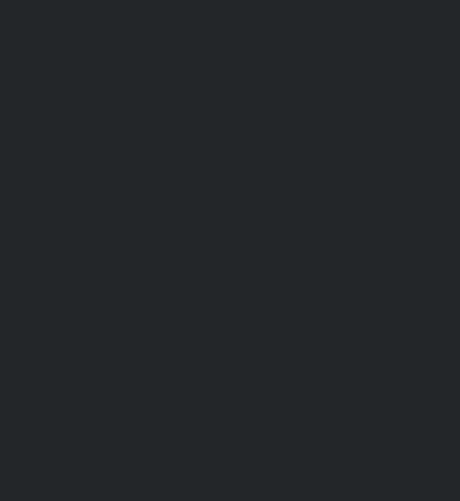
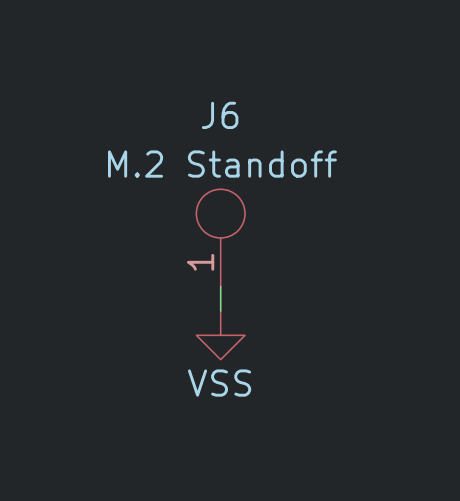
J6: none -> M.2 Standoff (220, 237)
wire: none -> (220, 286) (220, 310)
power symbol: none -> VSS (220, 335)

